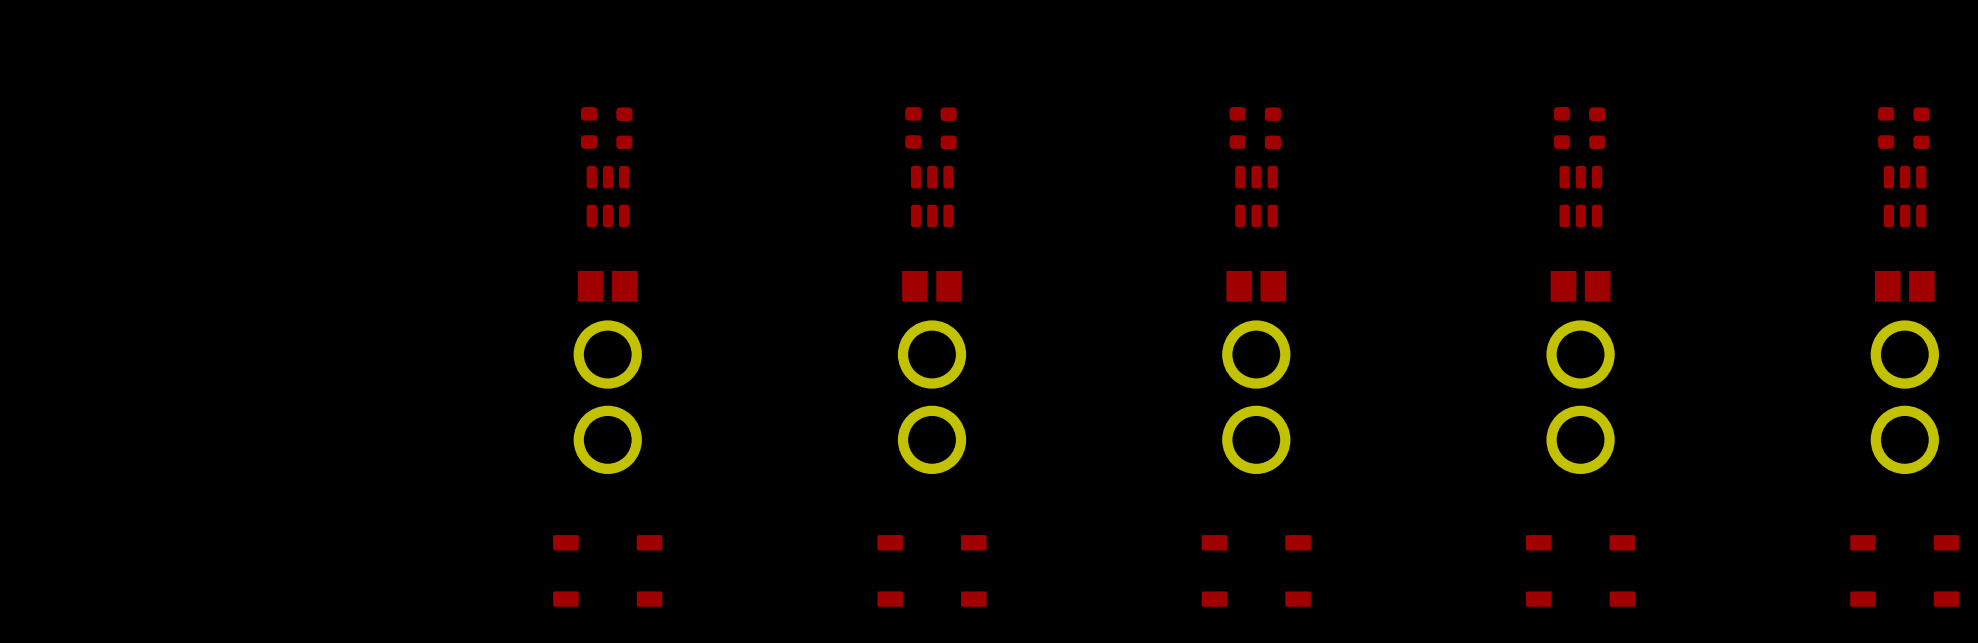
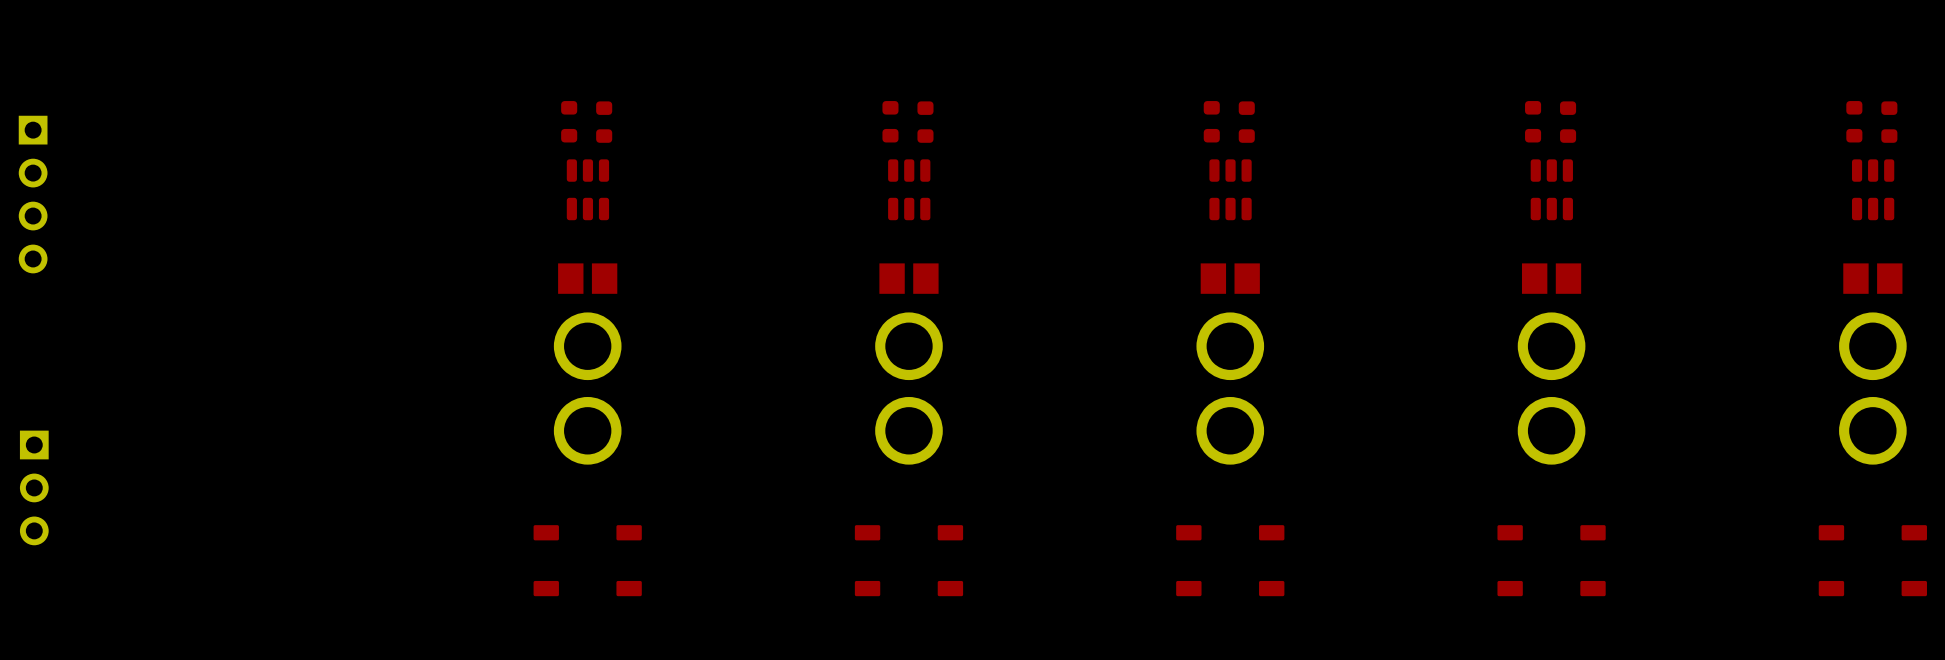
part: none -> (33, 194)
part: none -> (34, 487)

